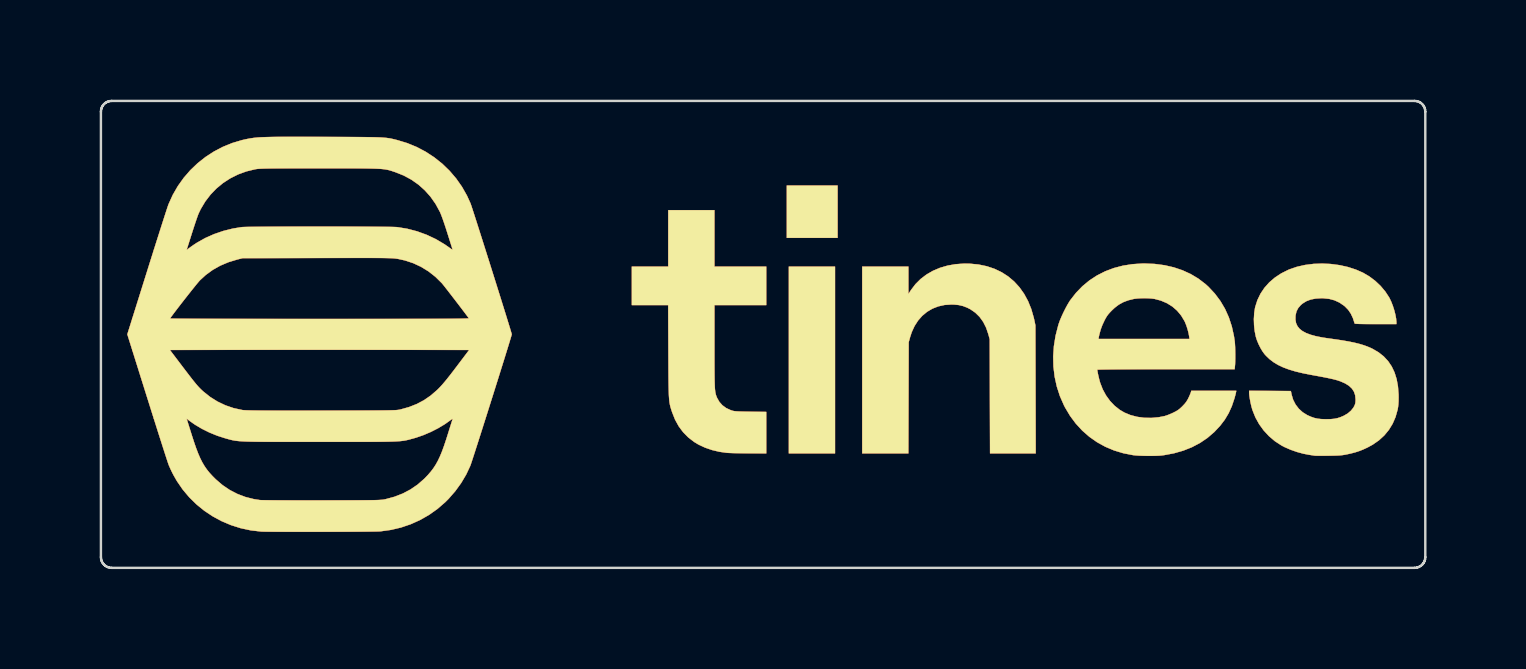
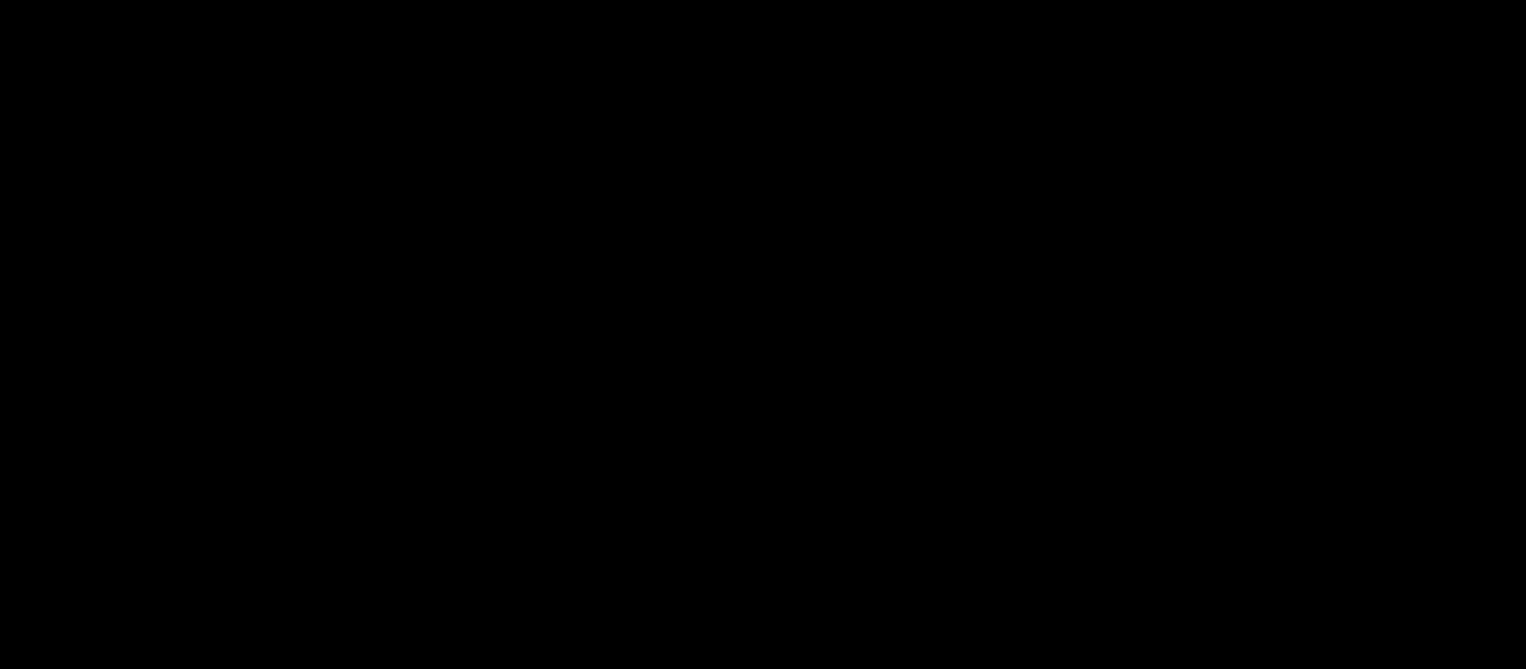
board edge: (111, 100) (1418, 101) (1423, 105) (1425, 111) (1424, 561) (1420, 566) (1414, 567) (107, 567) (102, 563) (100, 557) (100, 111) (104, 104) (111, 100) -> none
drawing: [127, 136, 1399, 532] -> none

